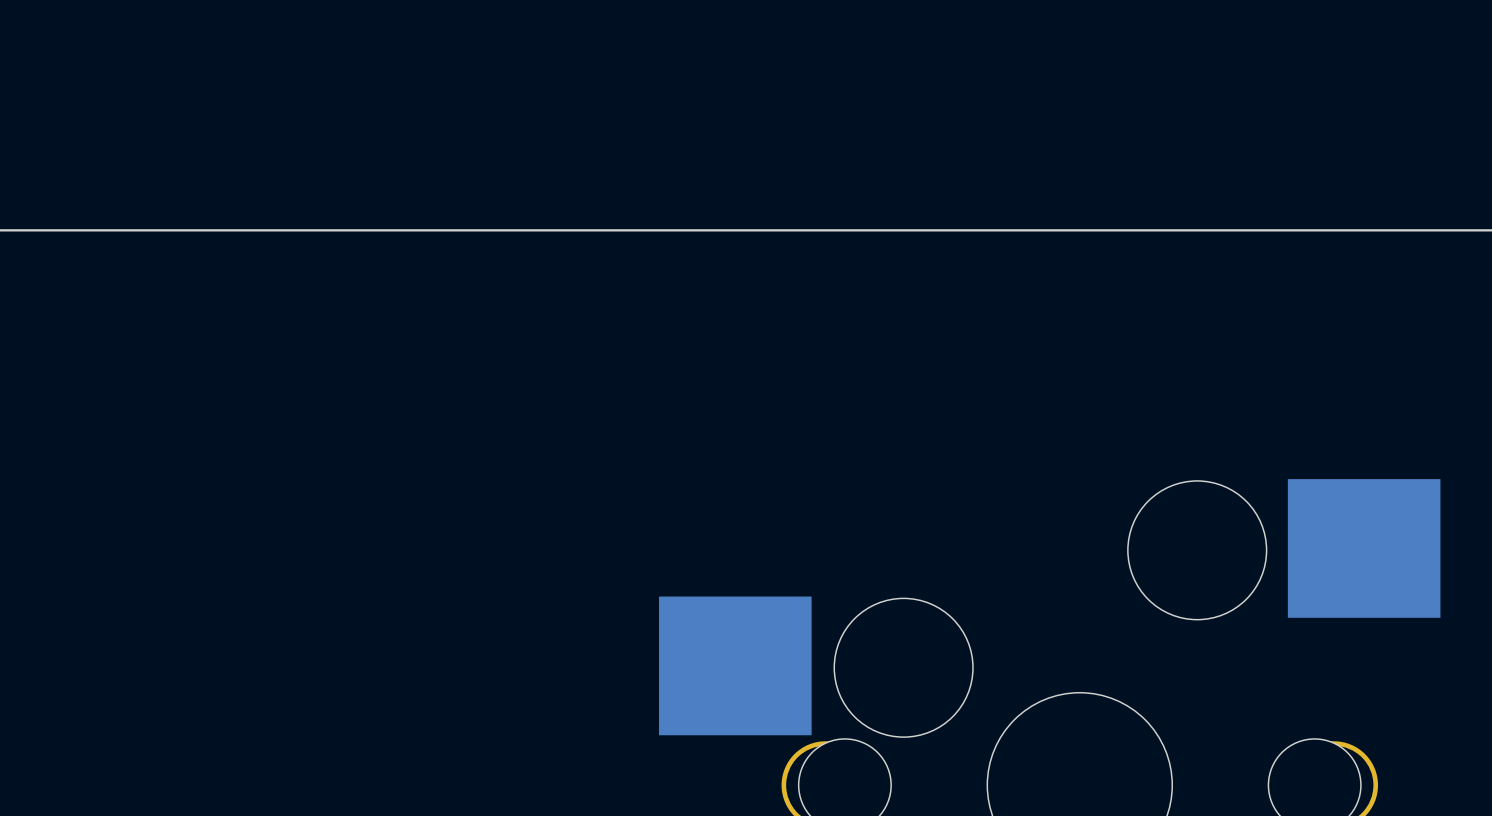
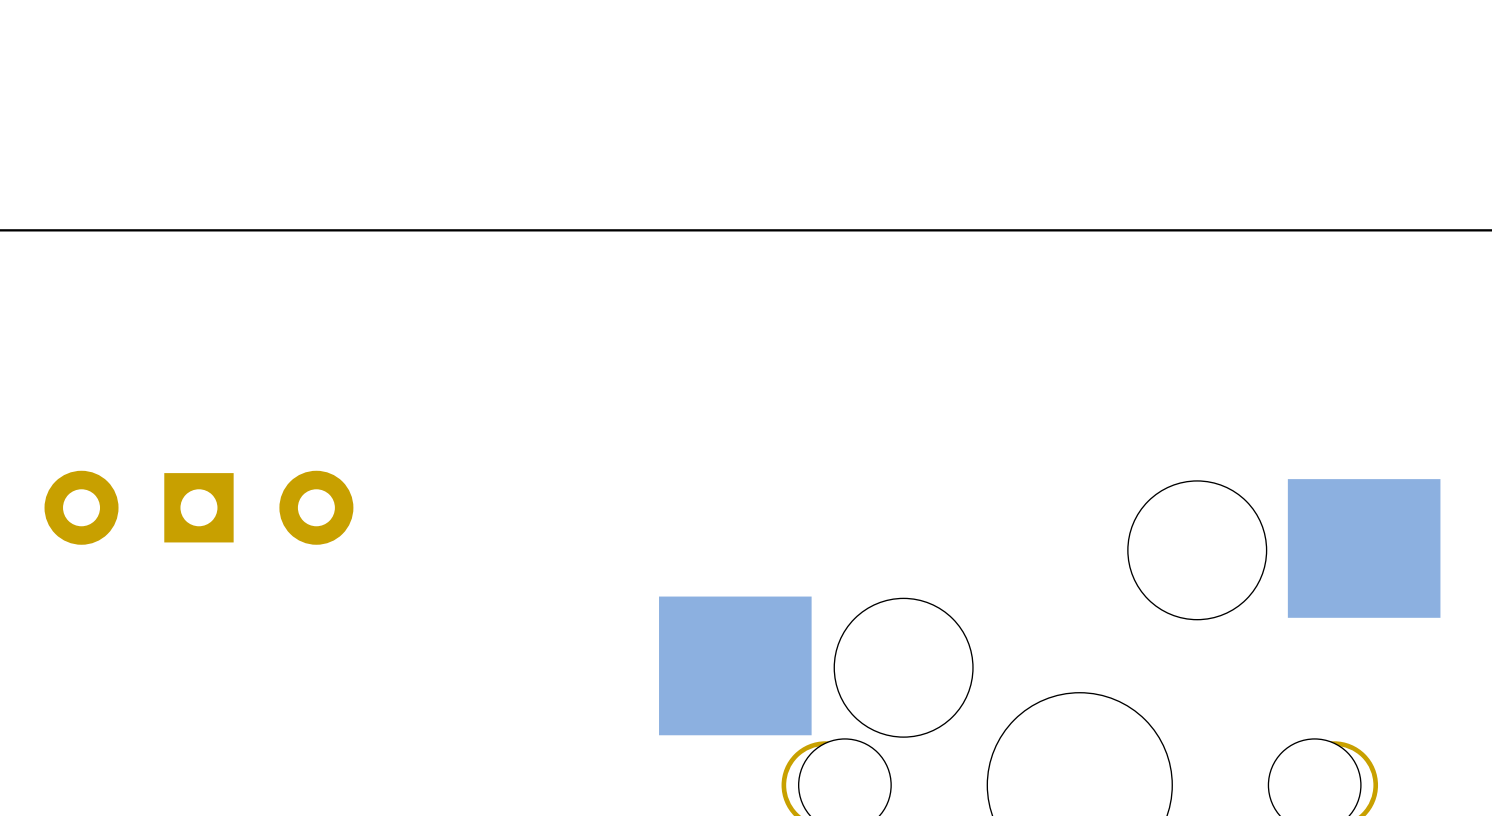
part: none -> (198, 507)

